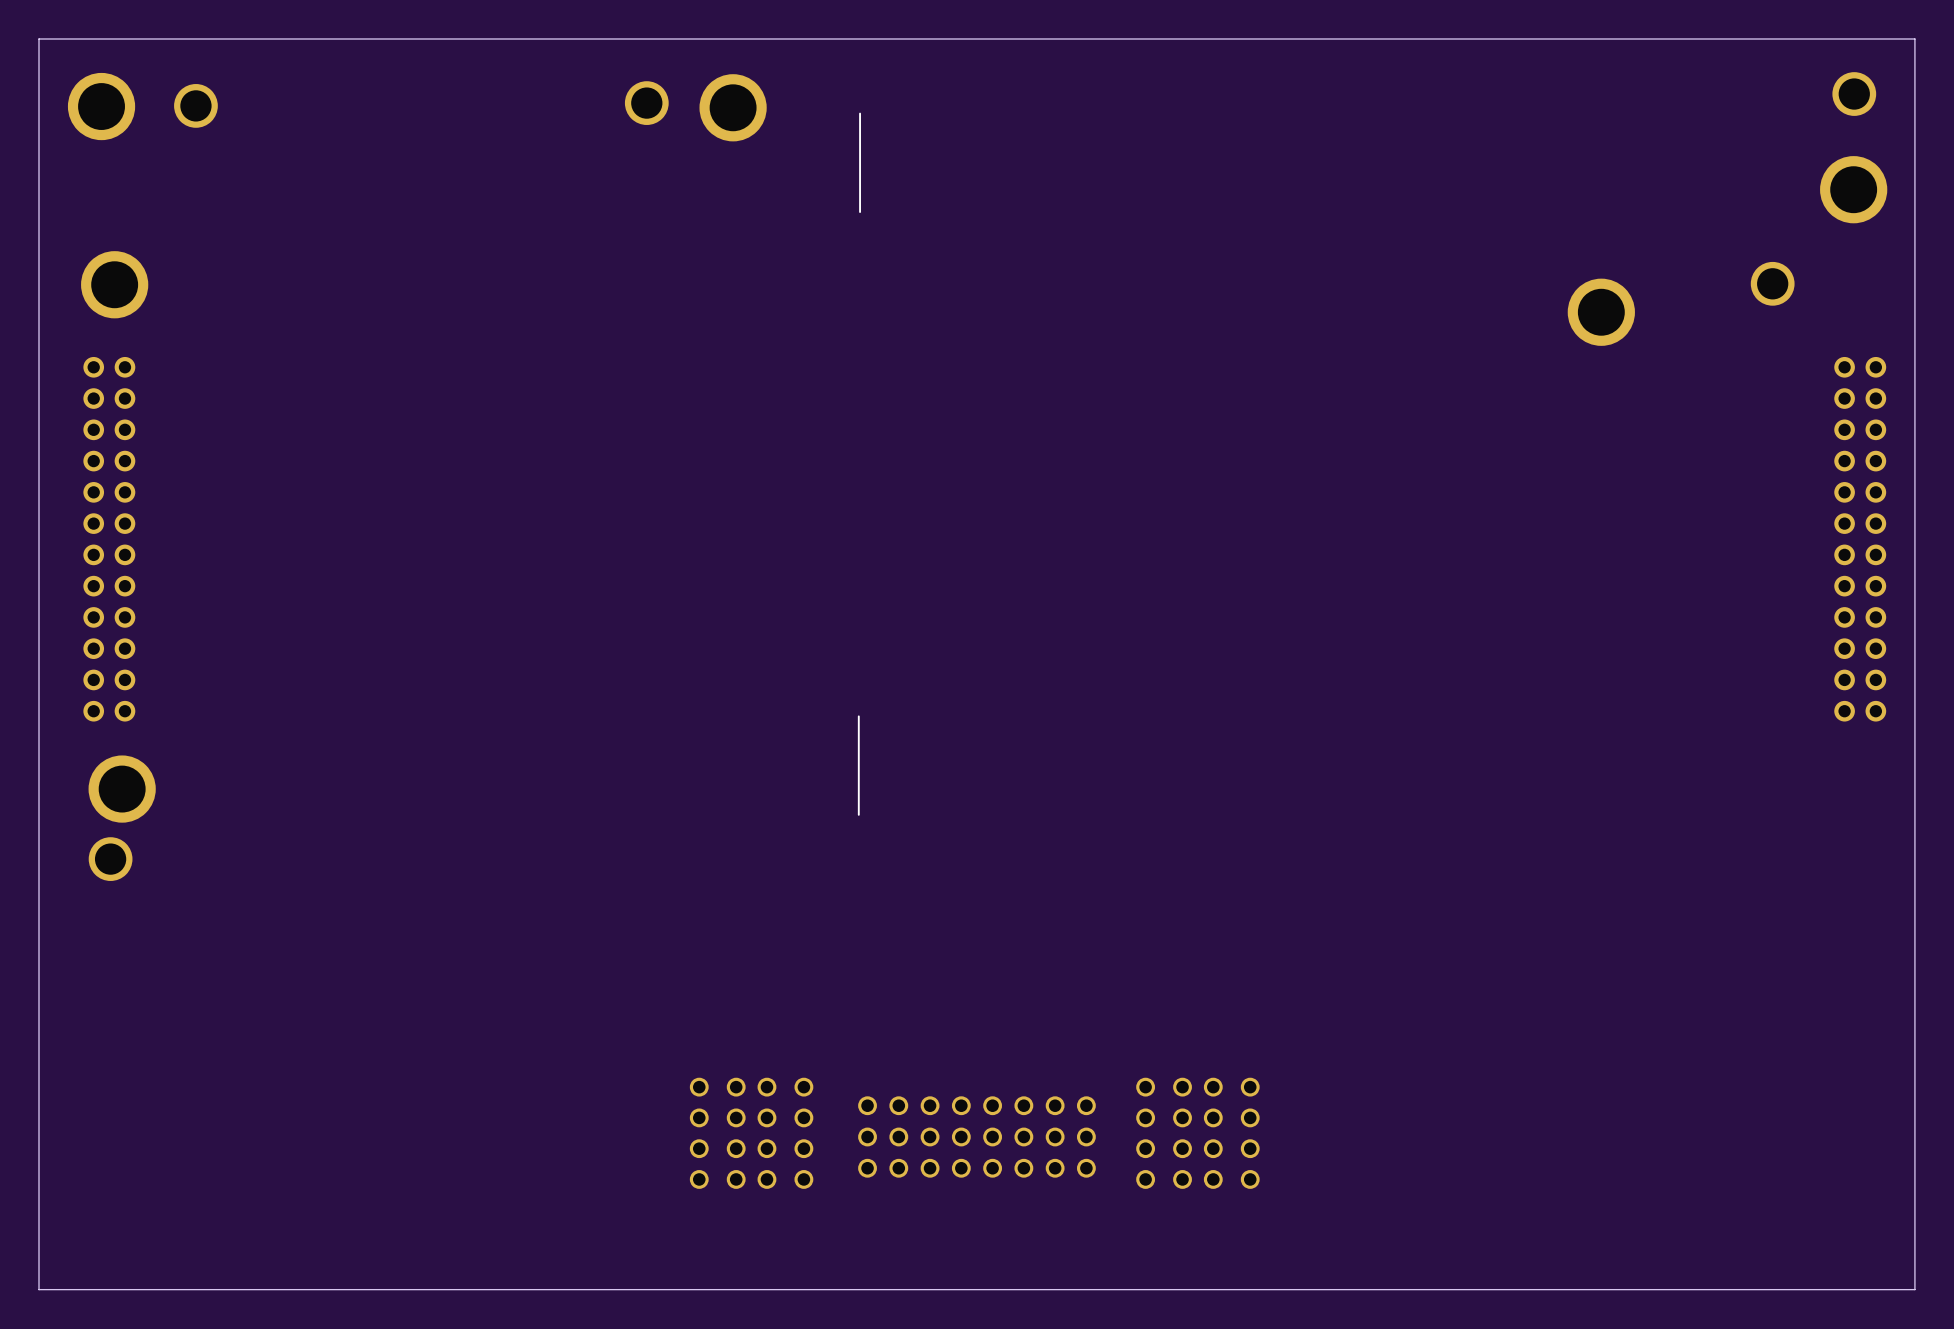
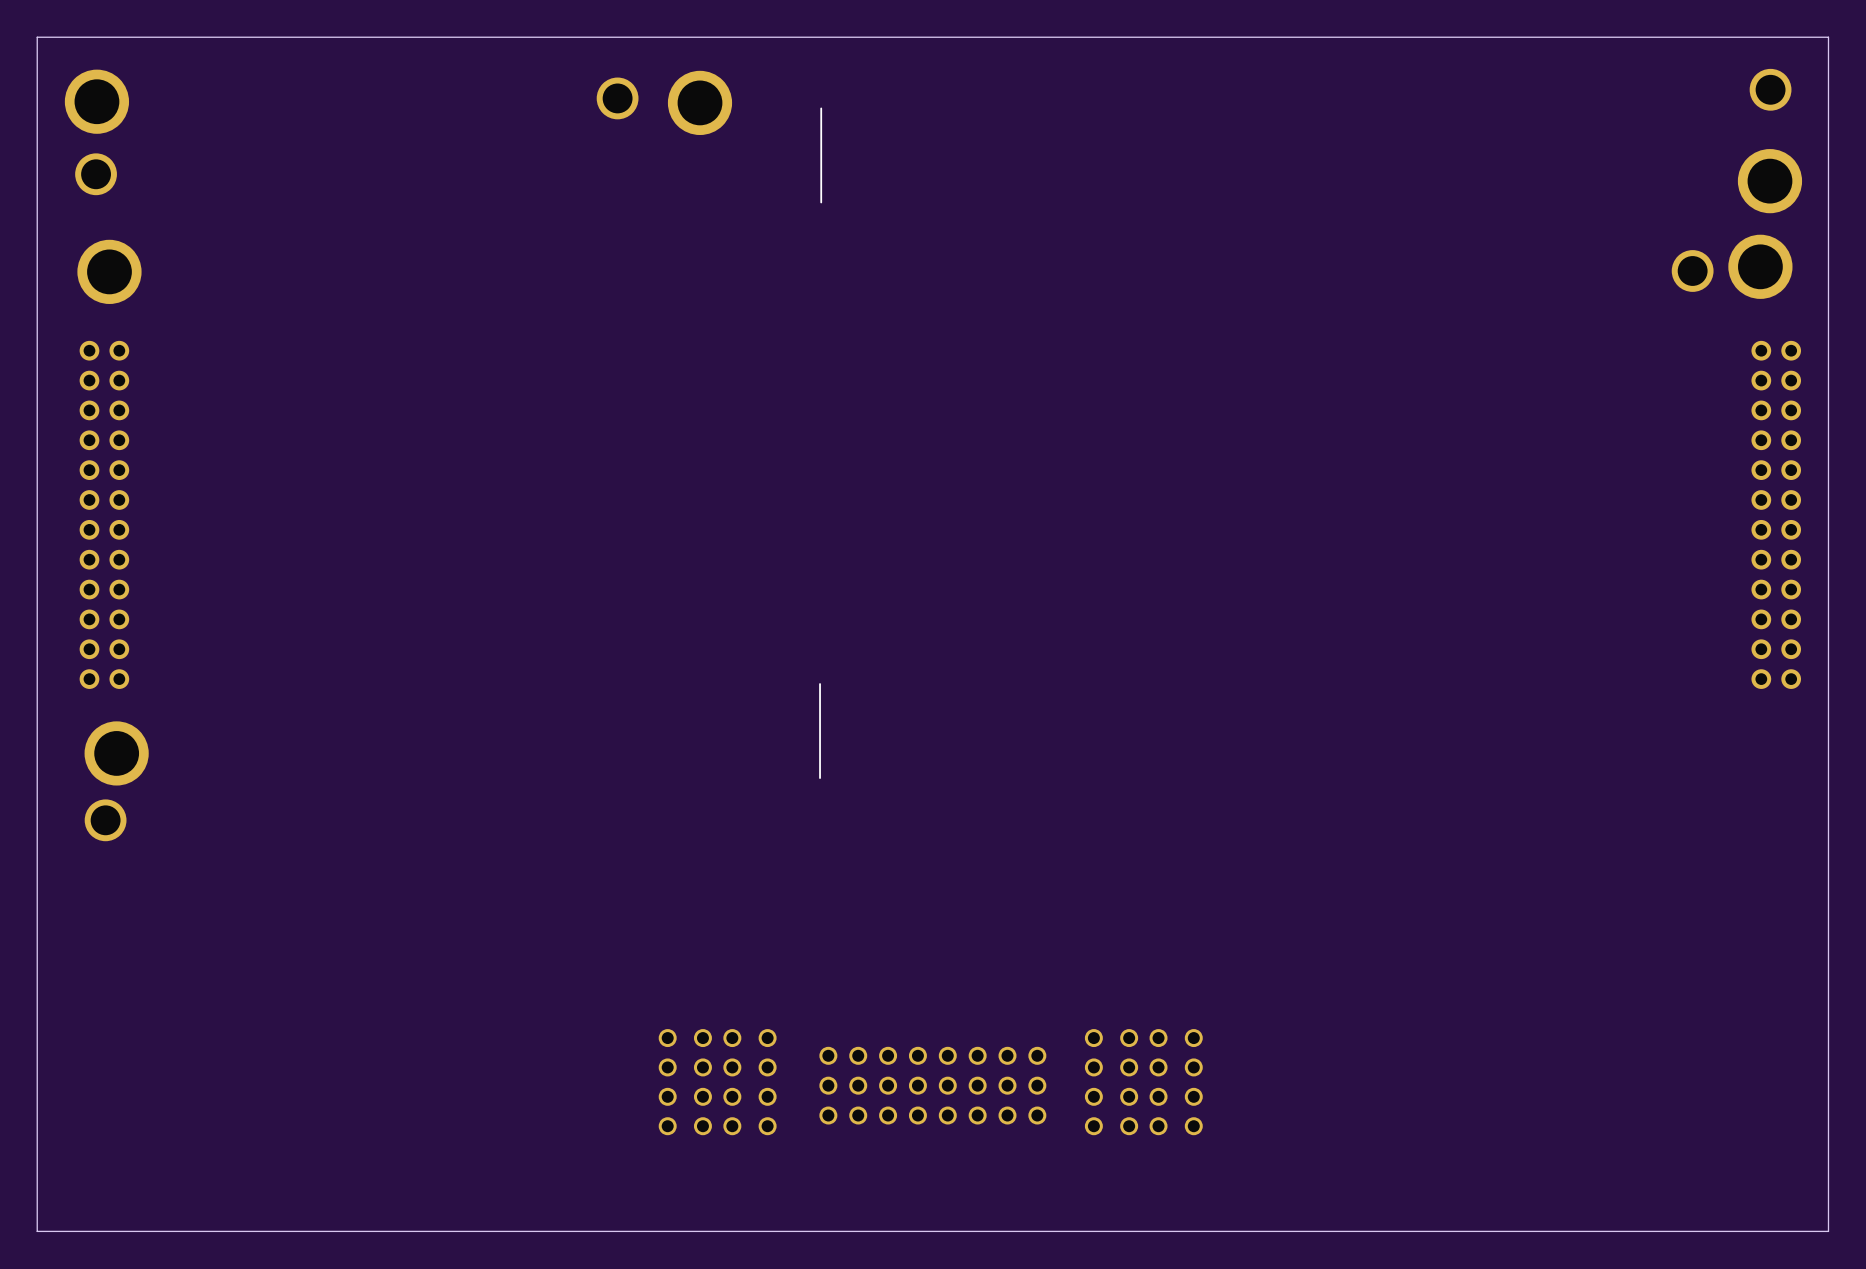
part position: (195, 105) -> (96, 174)
part position: (1601, 312) -> (1760, 266)

